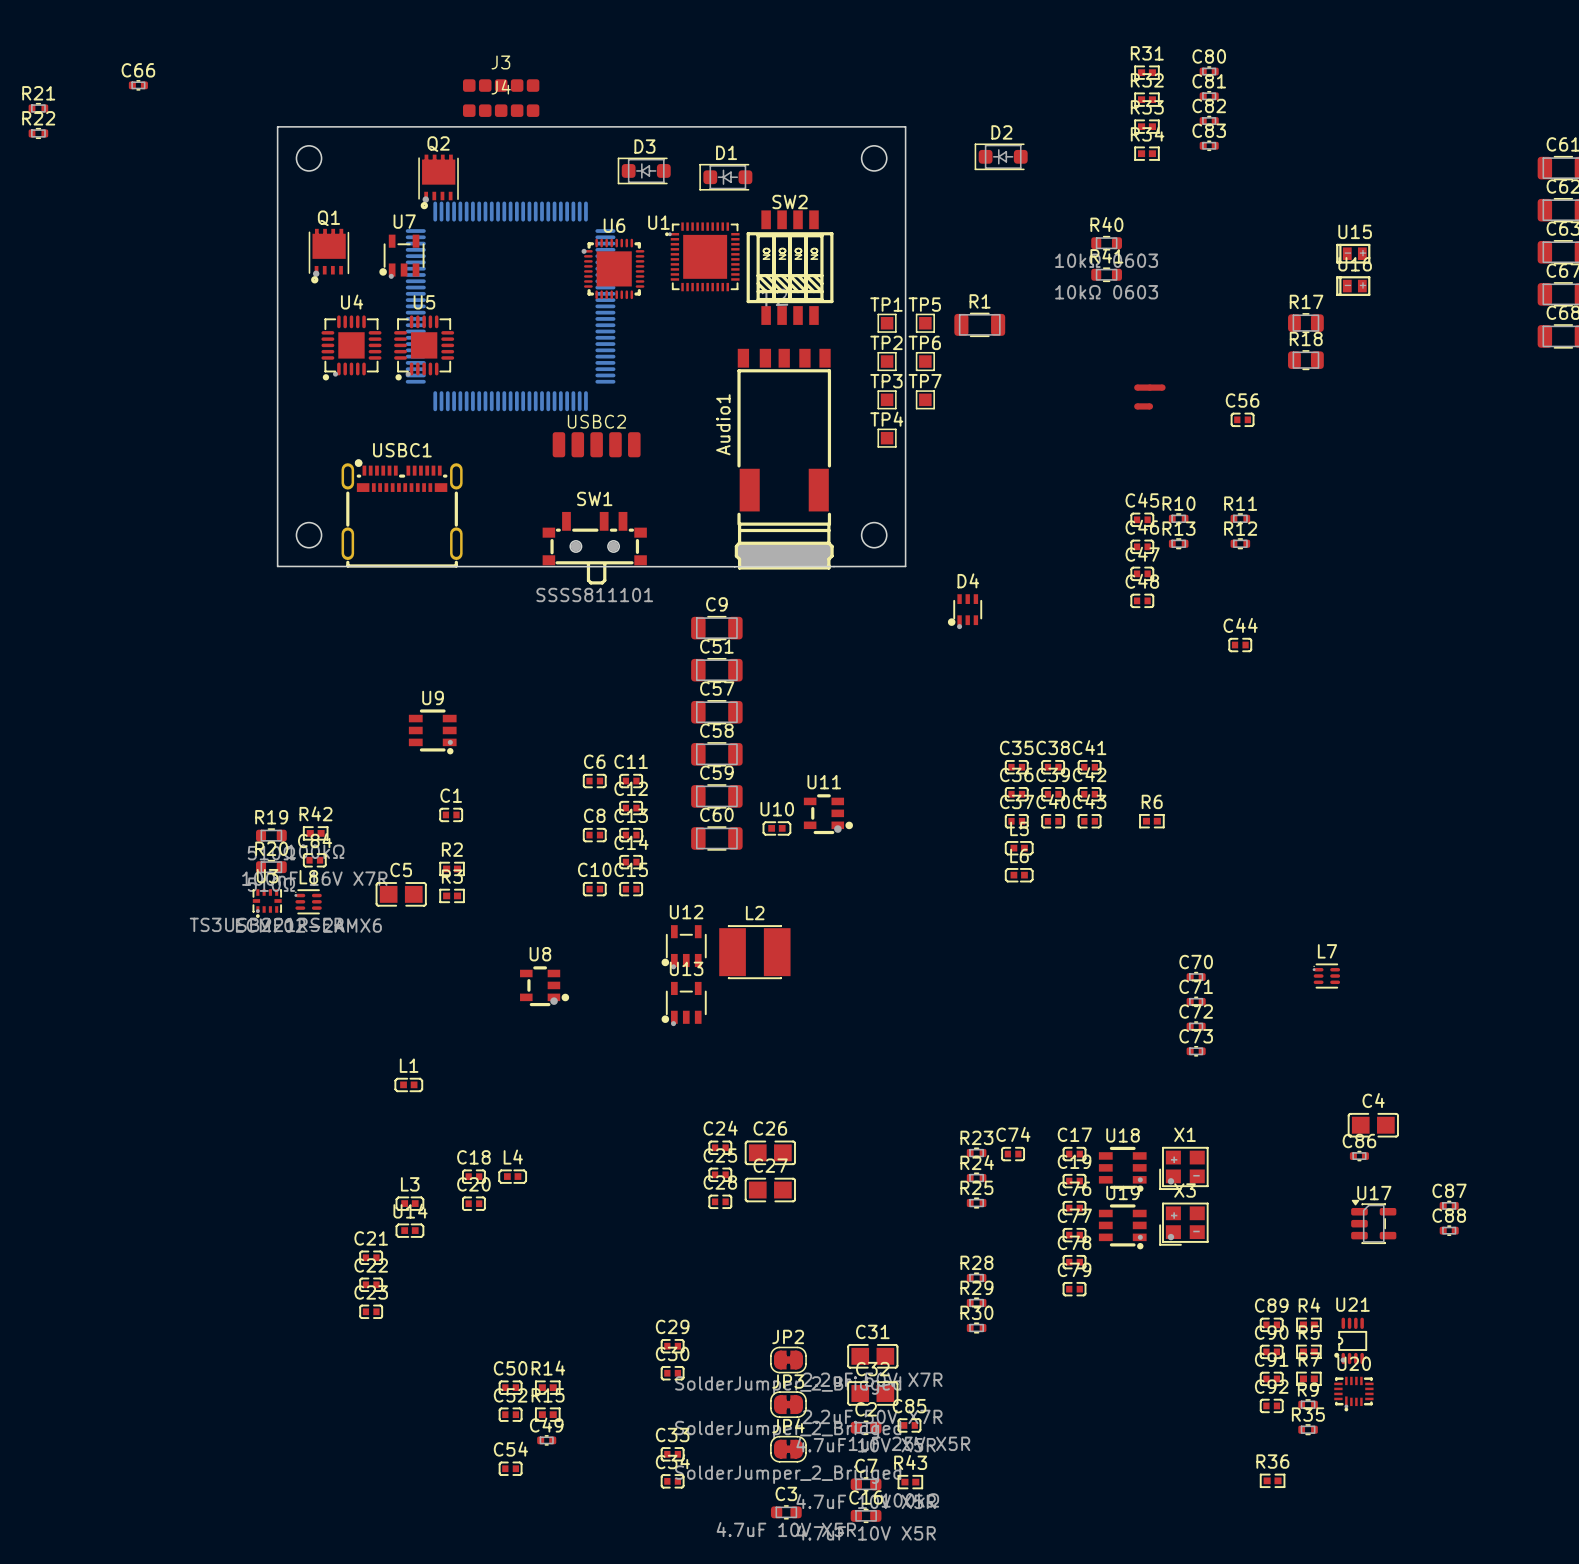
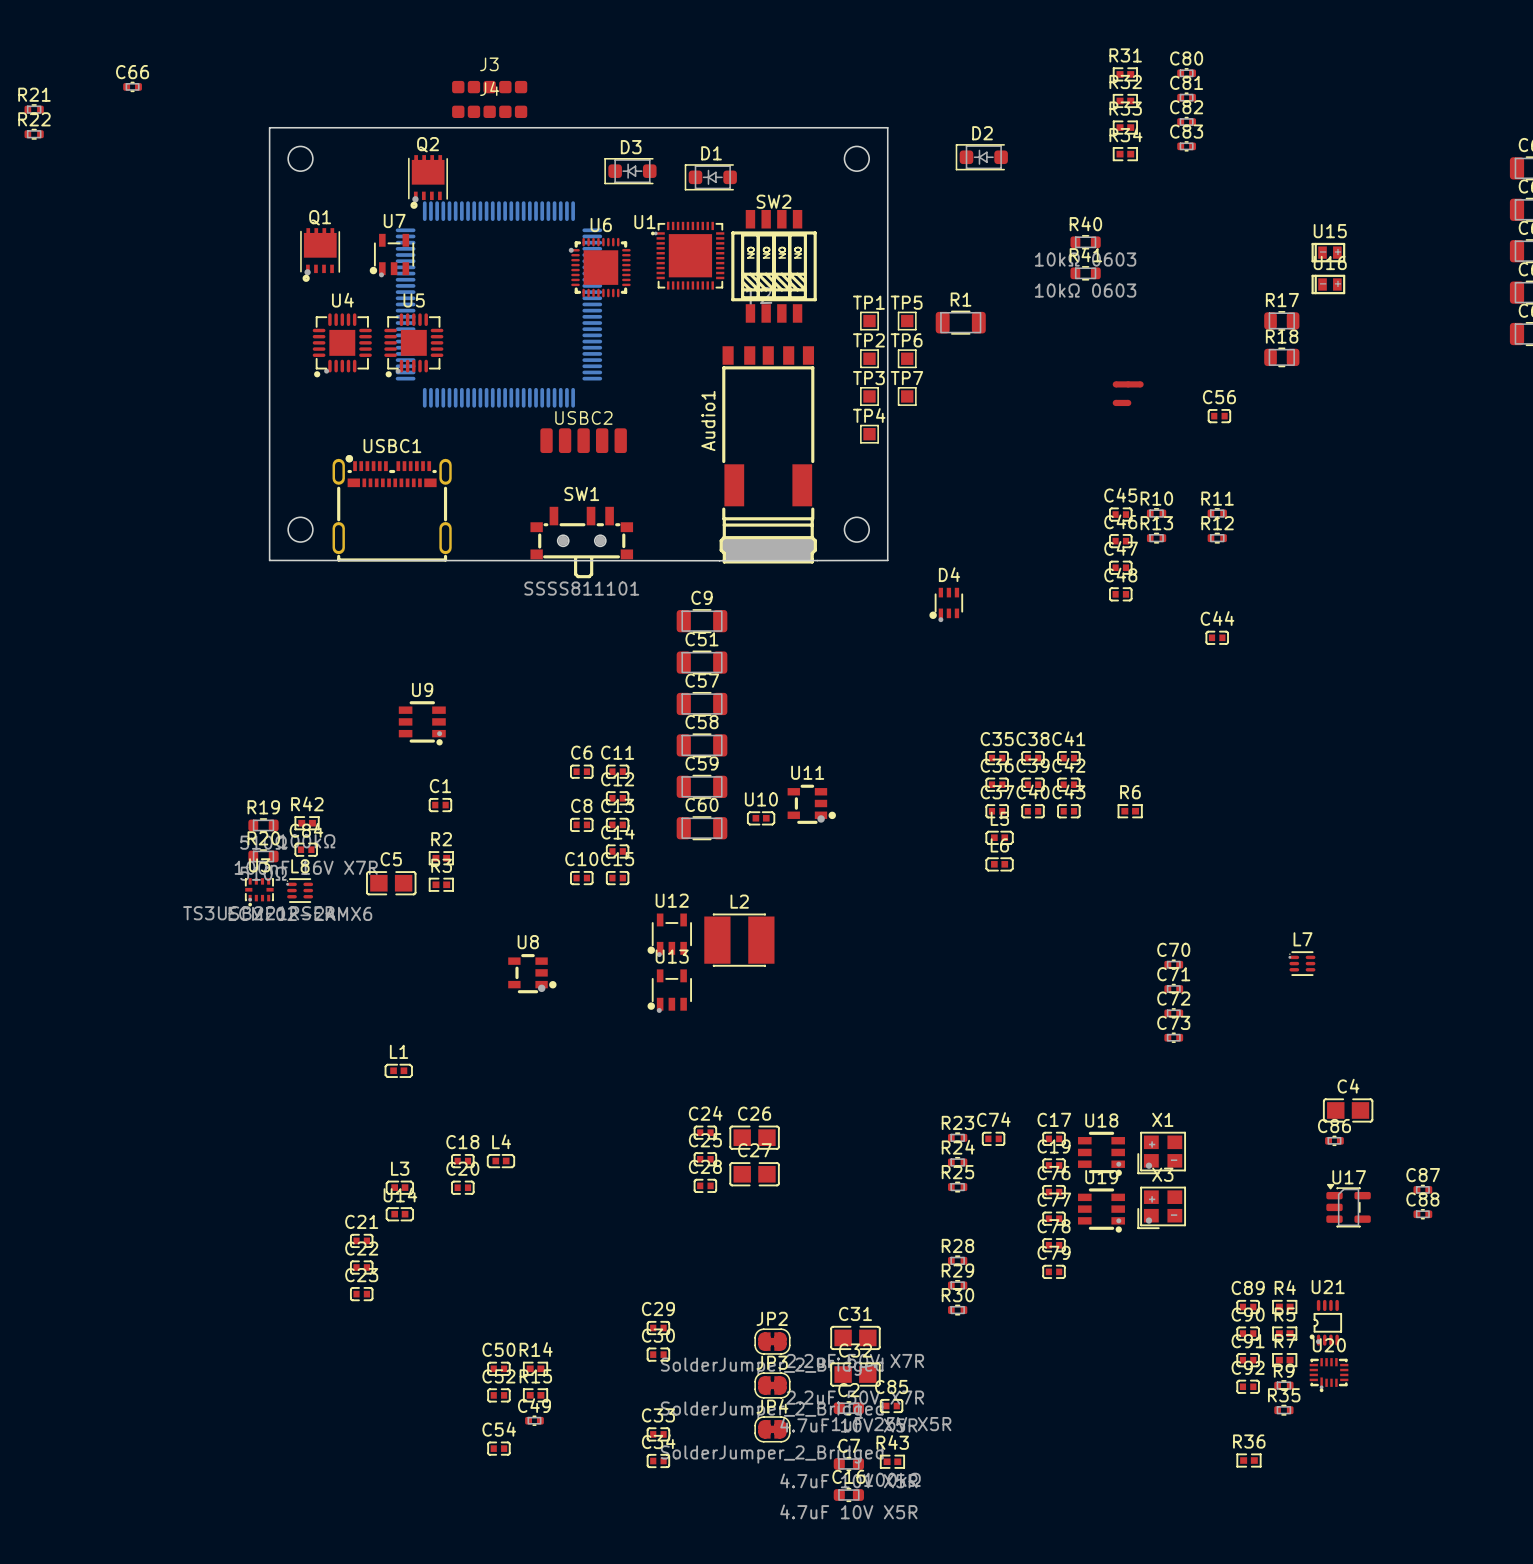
C3: 4.7uF 10V X5R (786, 1512) -> none

